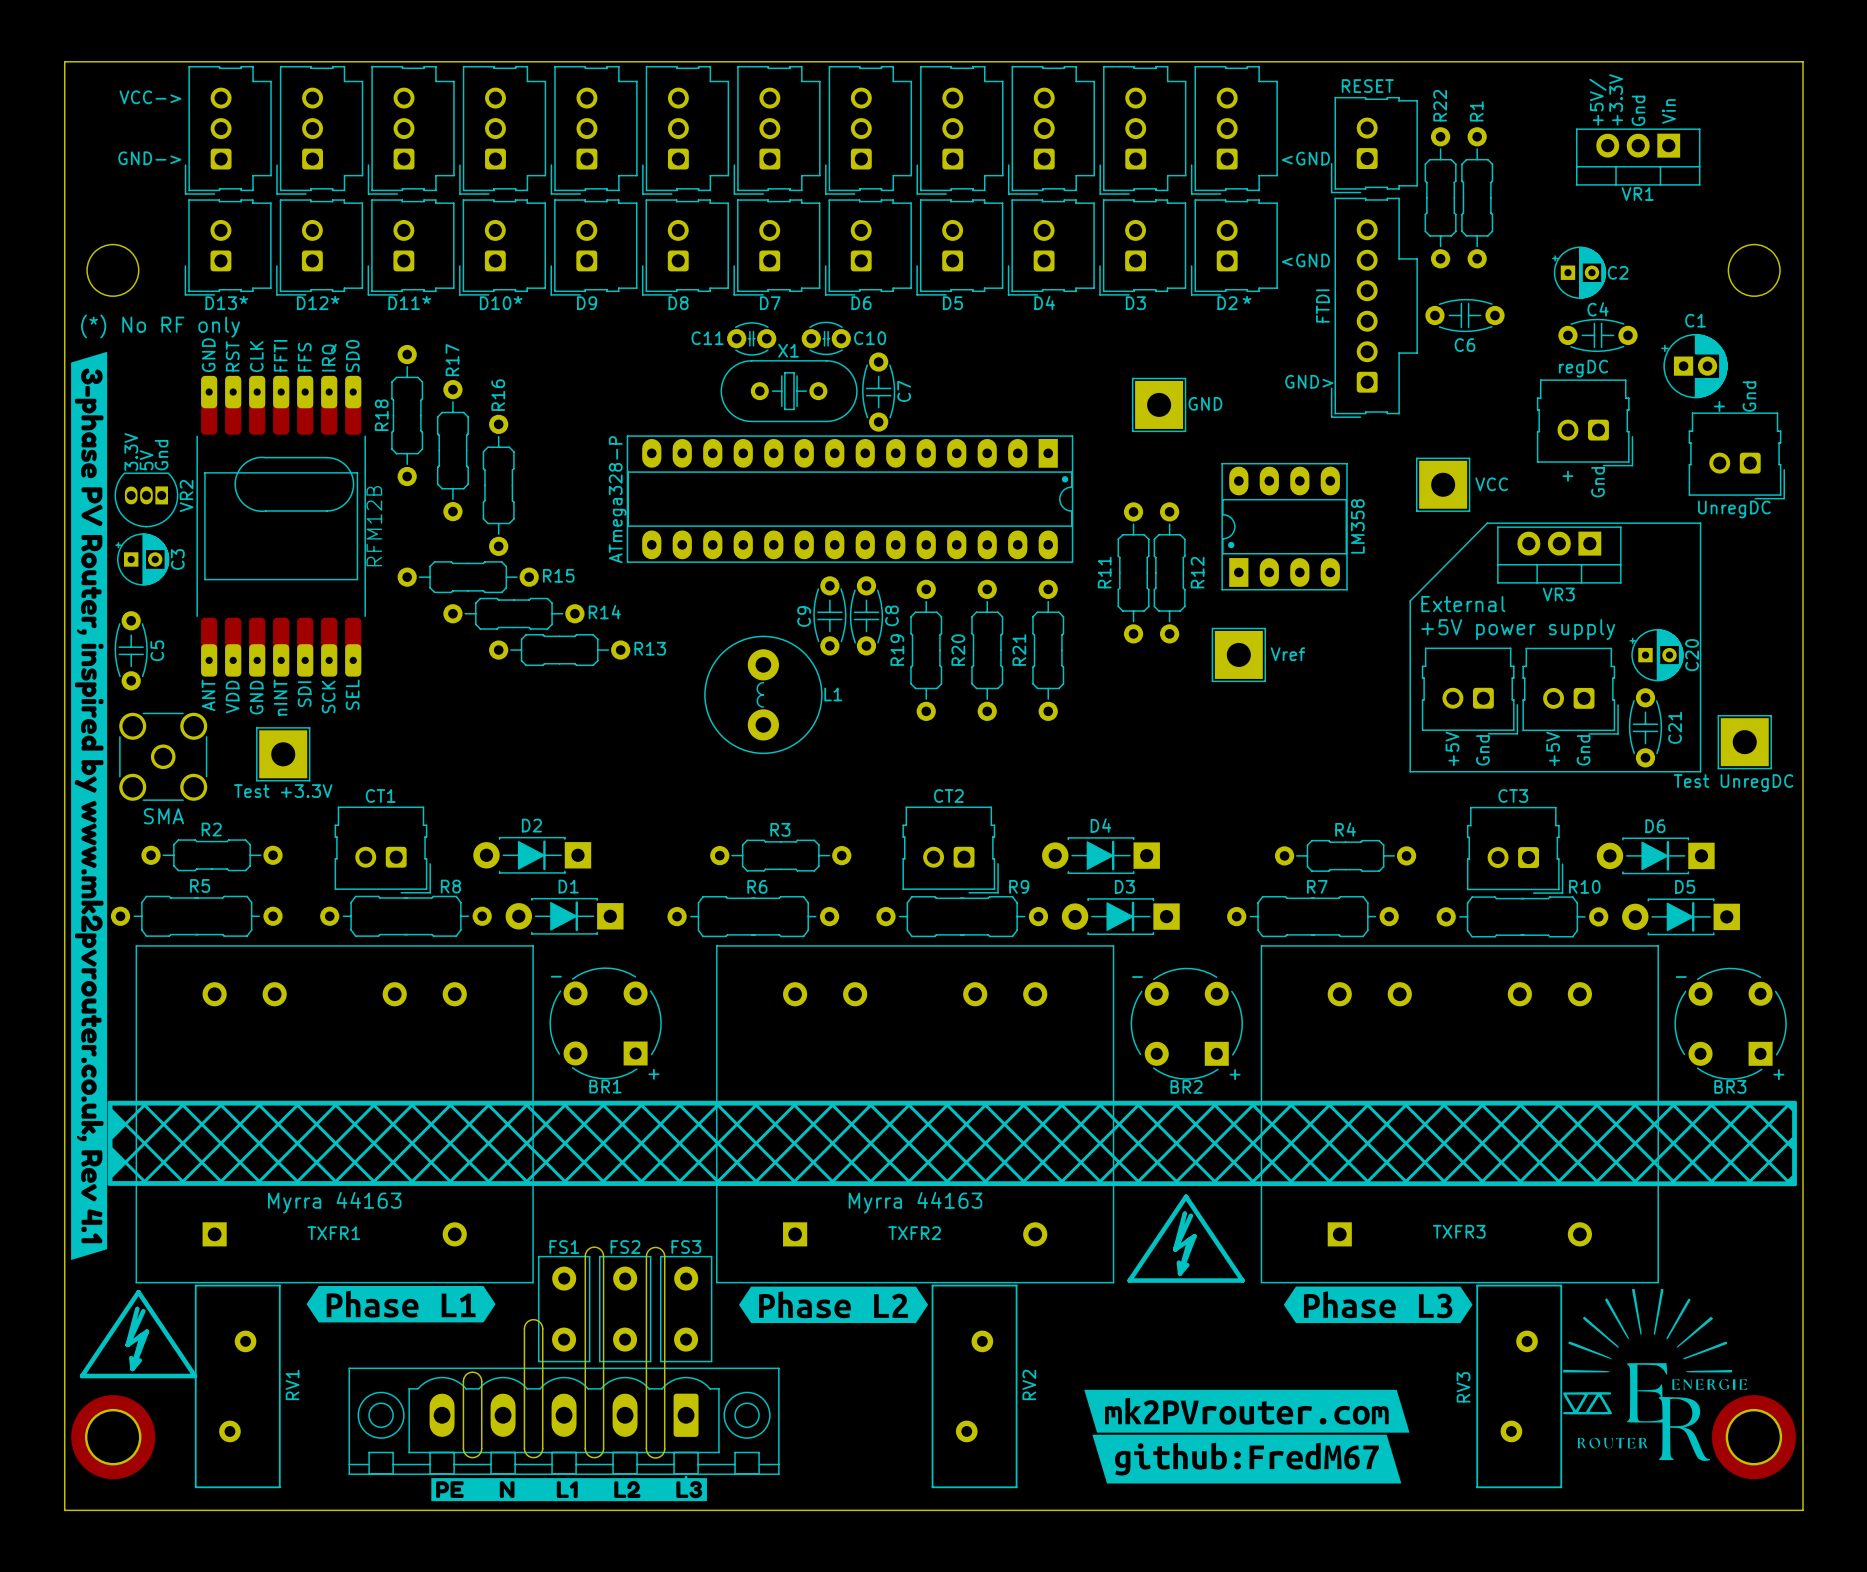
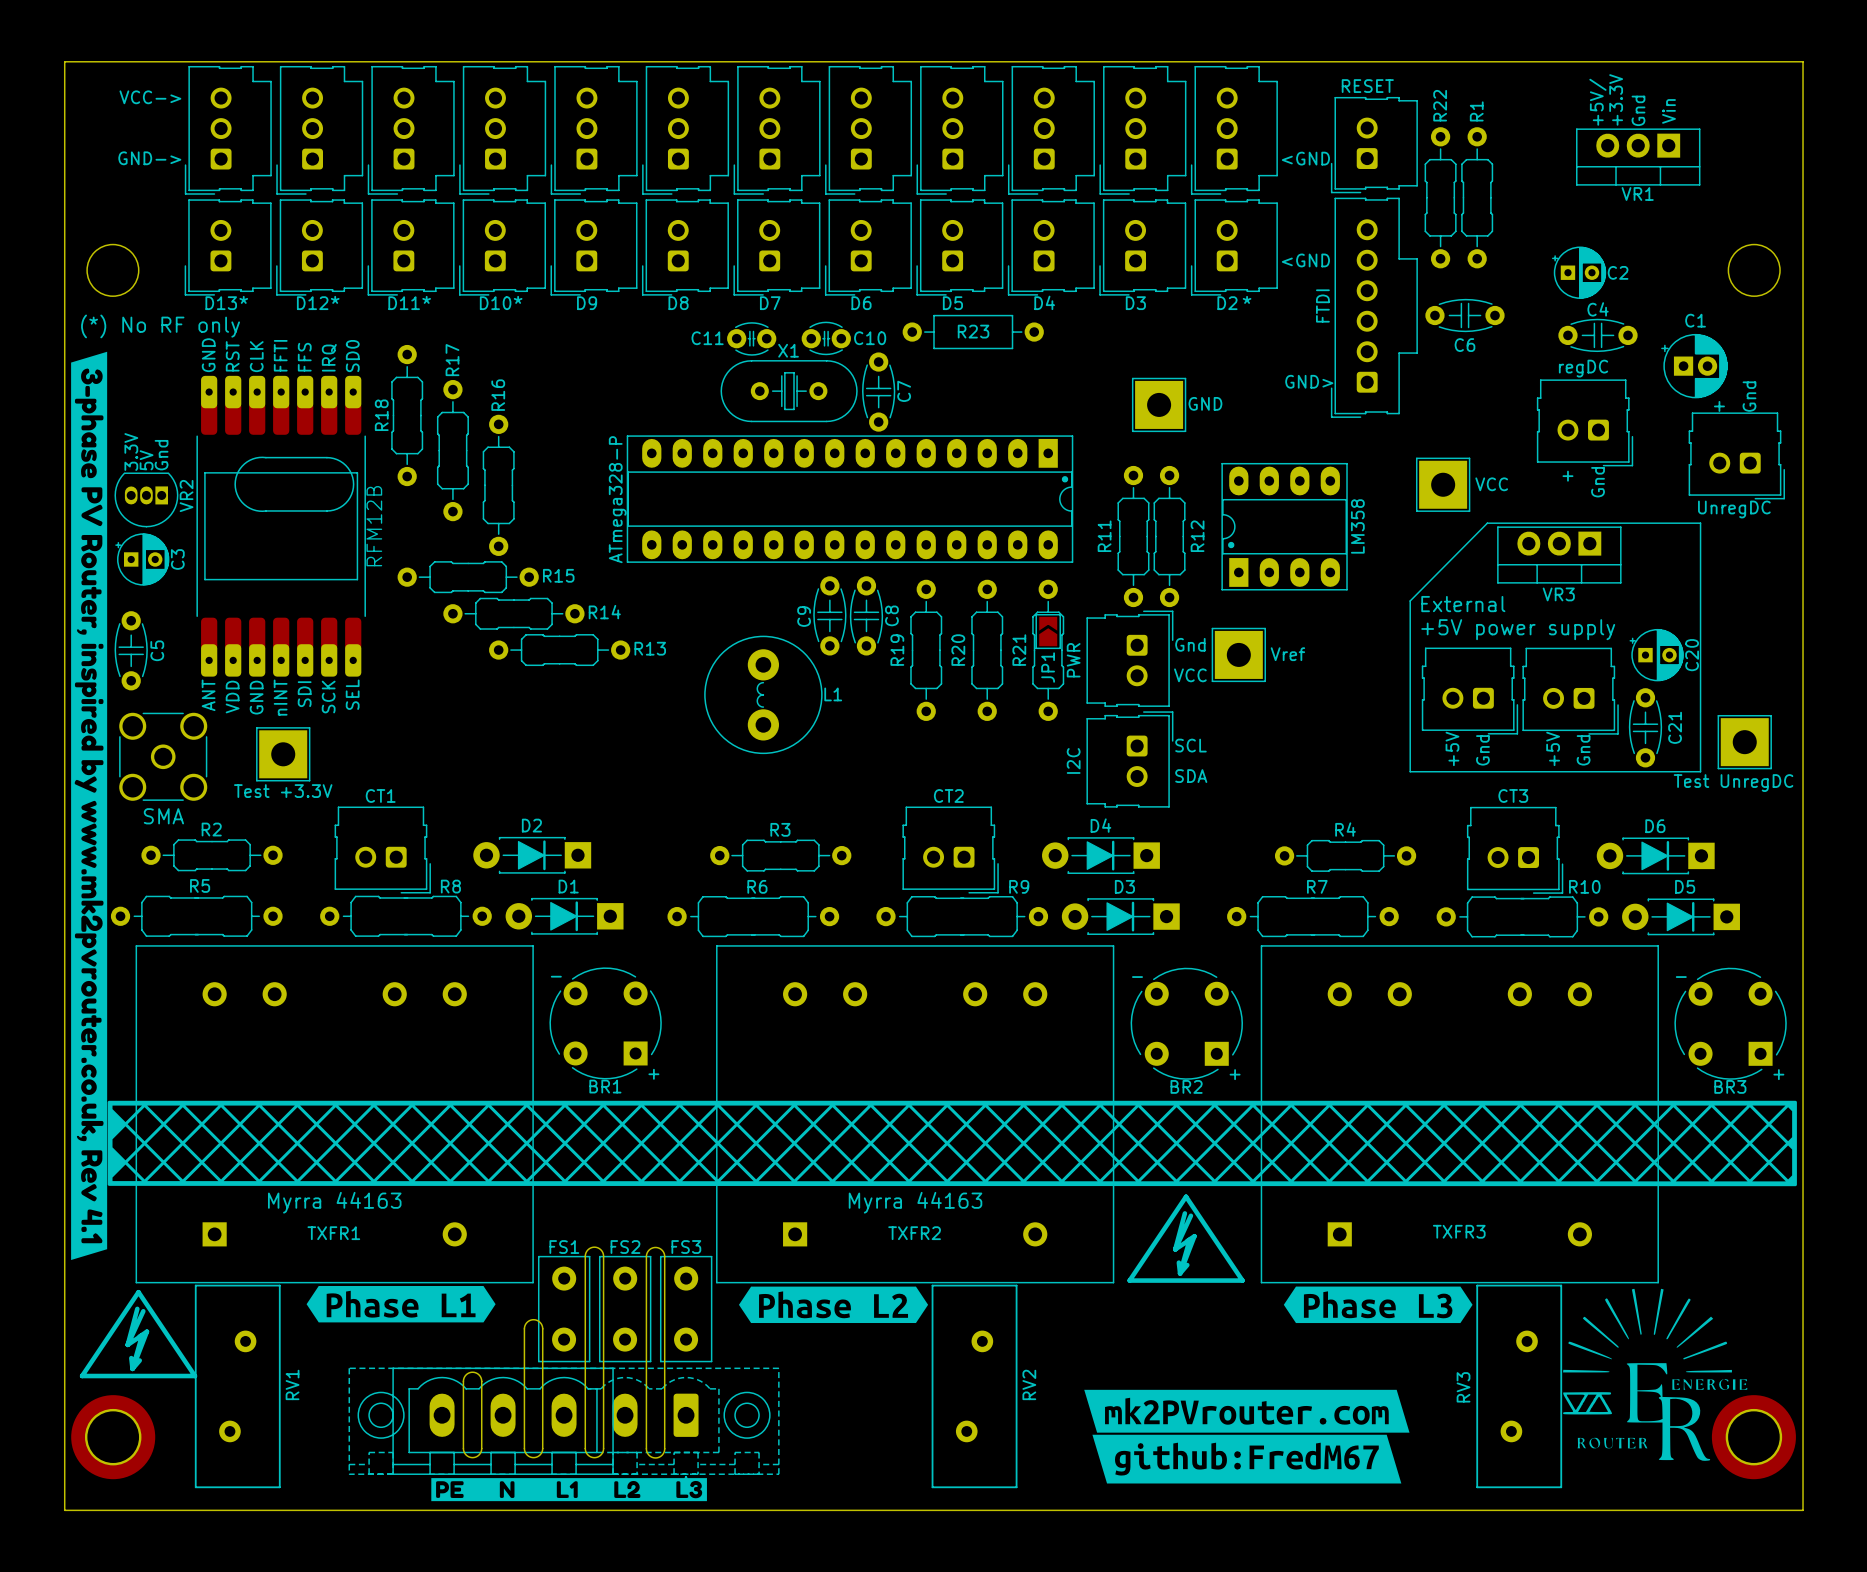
R23: none -> (973, 332)
R11 position: (1133, 572) -> (1133, 536)
R12 position: (1169, 572) -> (1169, 536)
JP1: none -> (1048, 631)
text: none -> Gnd (1190, 644)
part: none -> PWR (1129, 658)
text: none -> VCC (1190, 675)
text: none -> SCL (1190, 745)
part: none -> I2C (1129, 759)
text: none -> SDA (1191, 776)
part footprint: [348, 1367, 780, 1485] -> [348, 1367, 780, 1485]

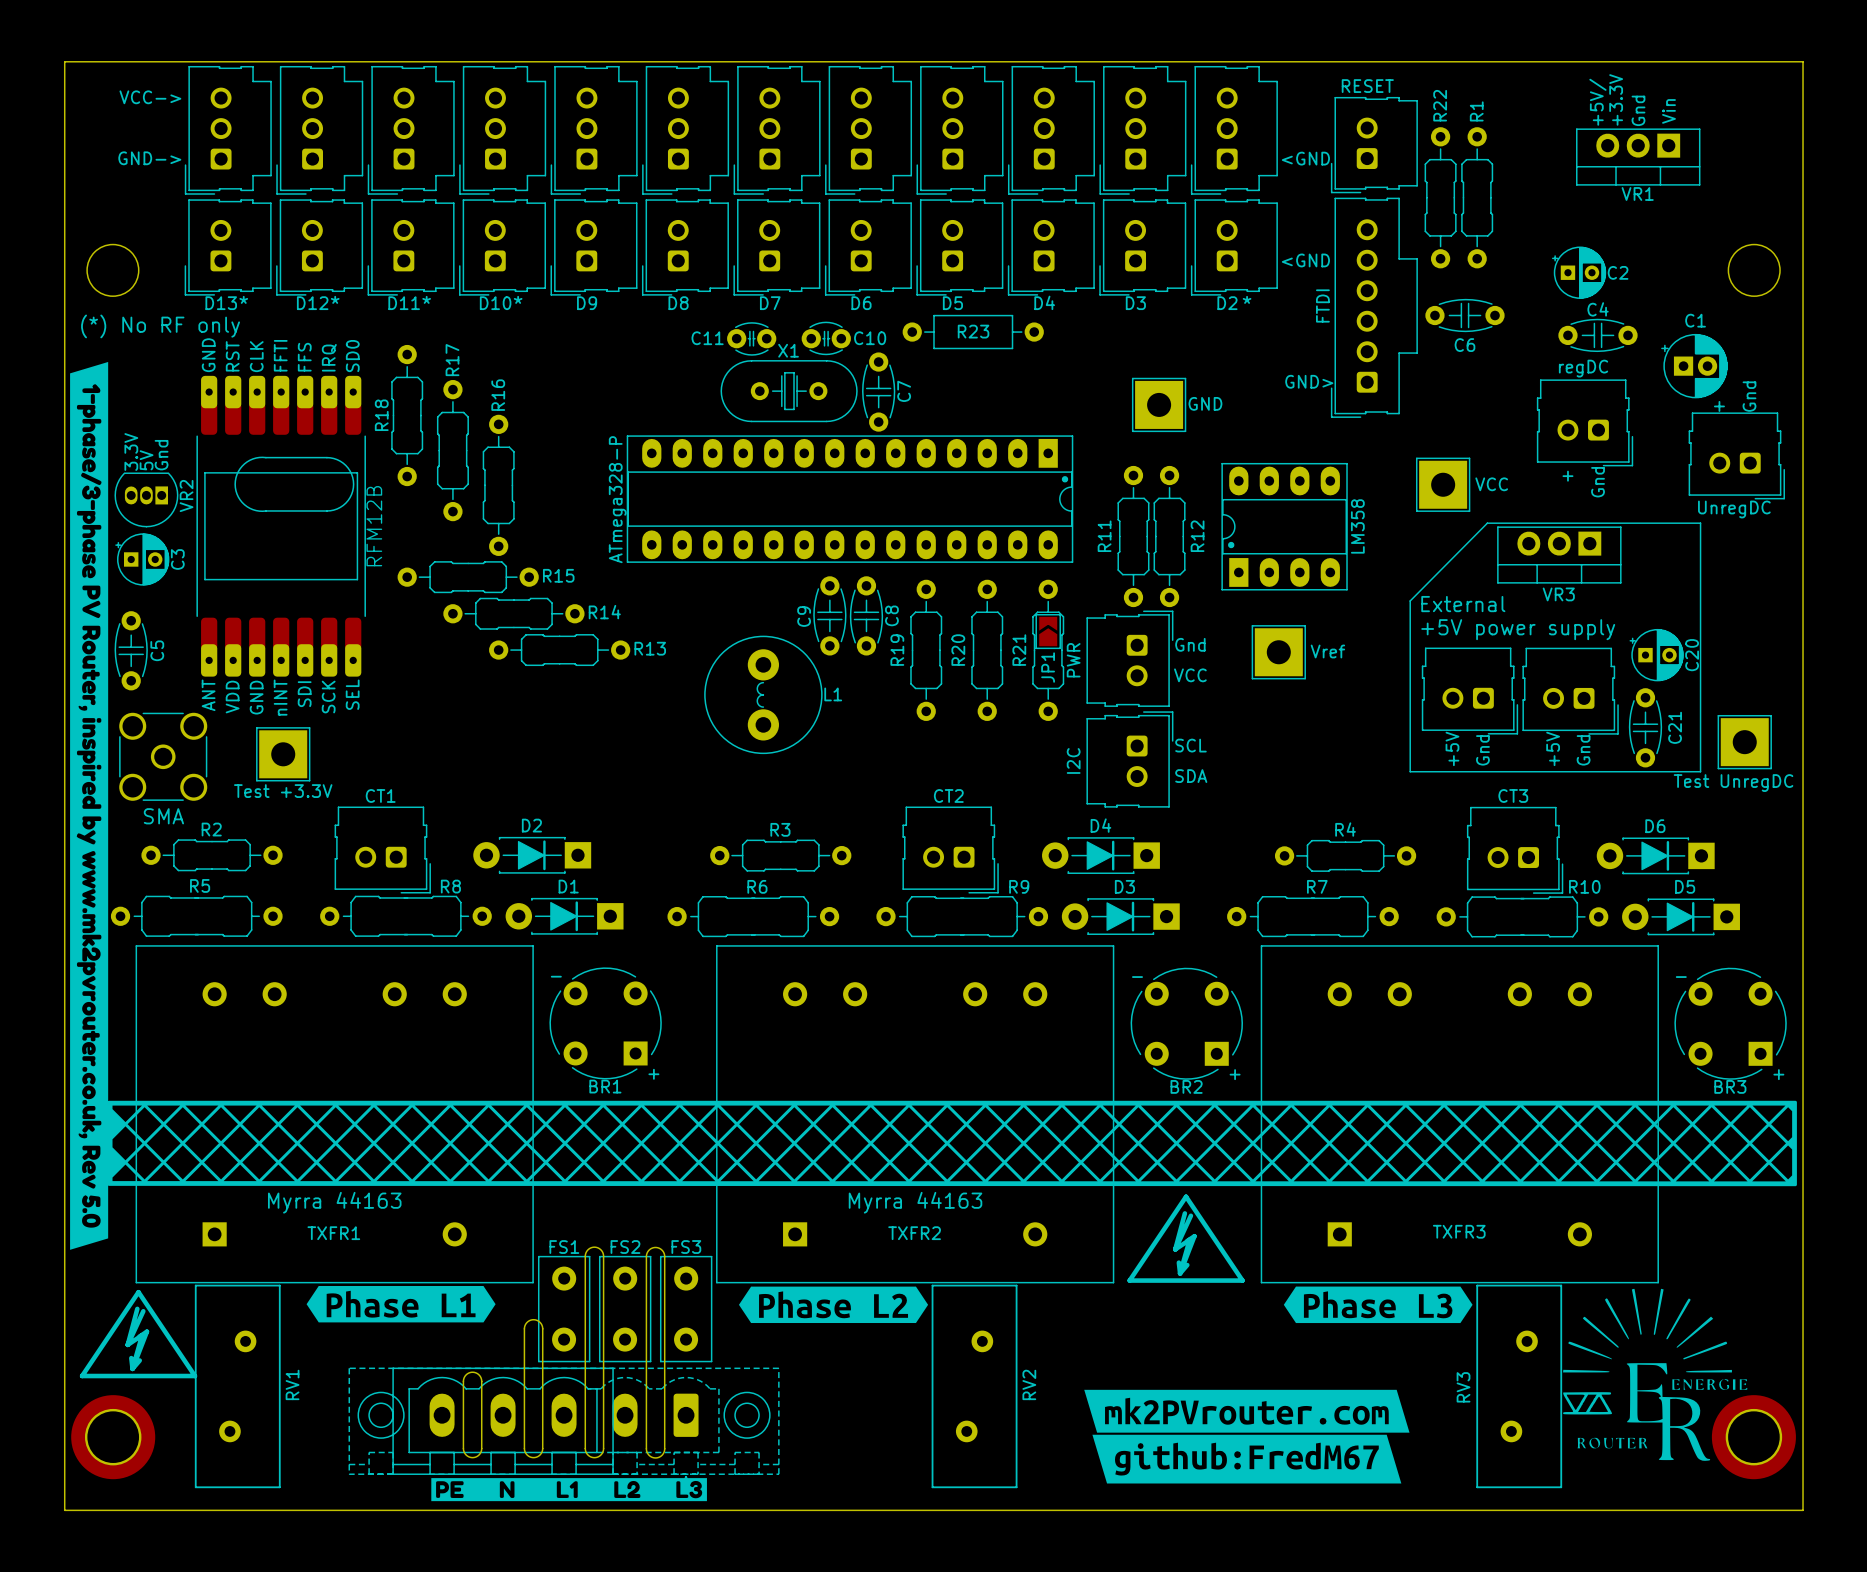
drawing shape: [71, 351, 108, 1261] -> [70, 361, 109, 1250]
part position: (1238, 654) -> (1278, 652)

